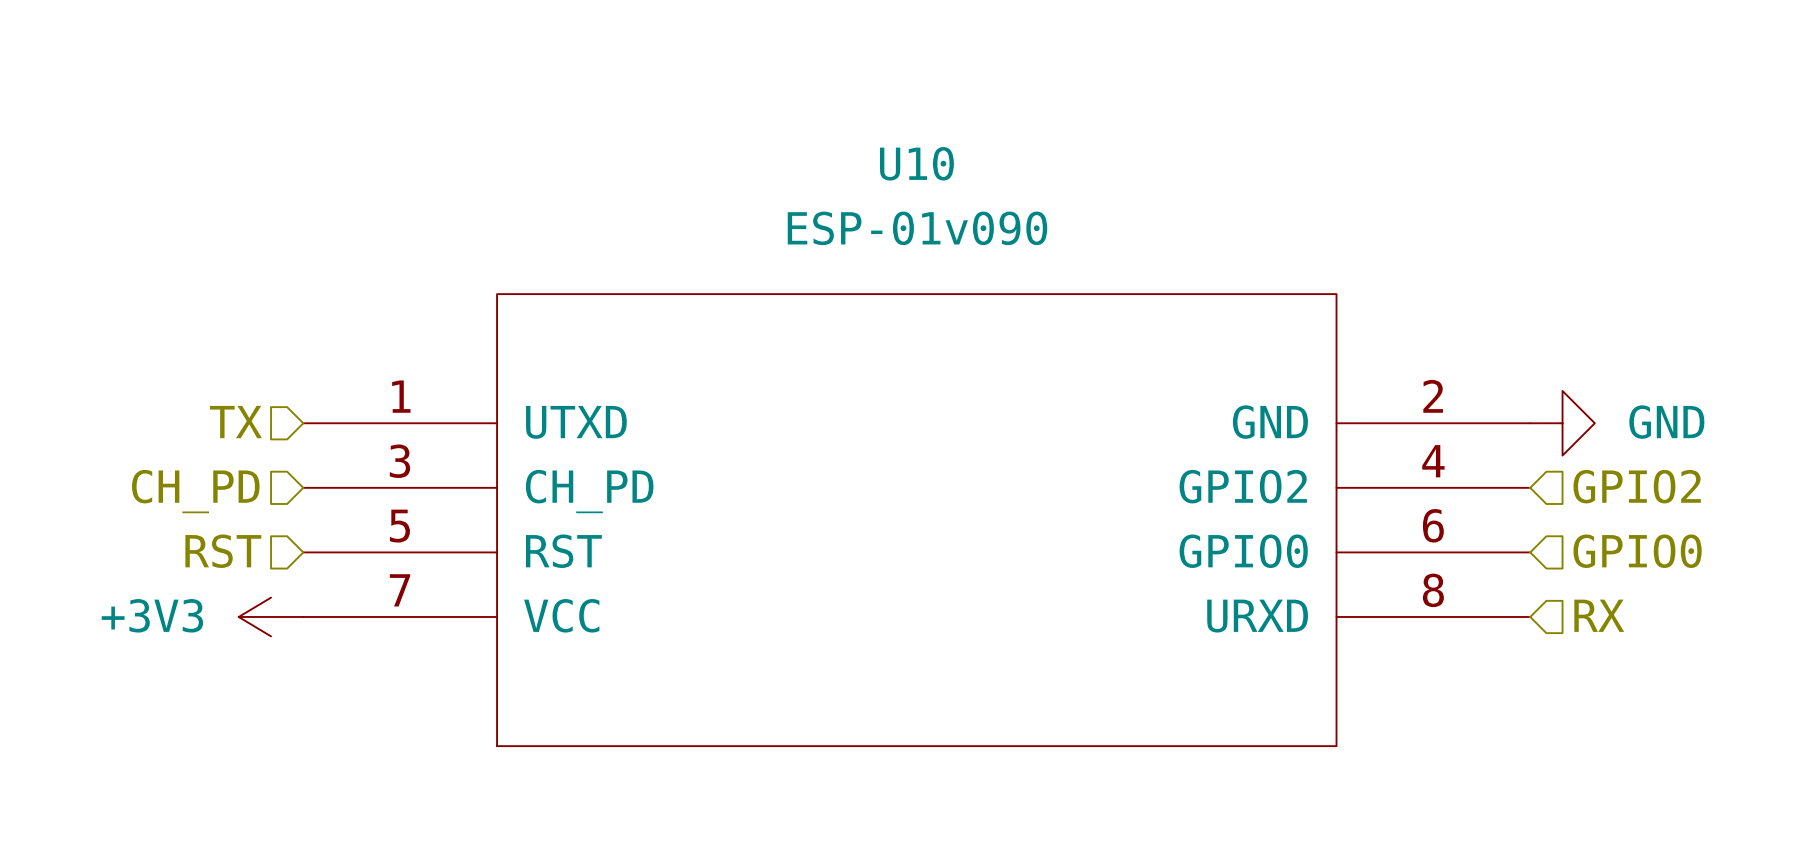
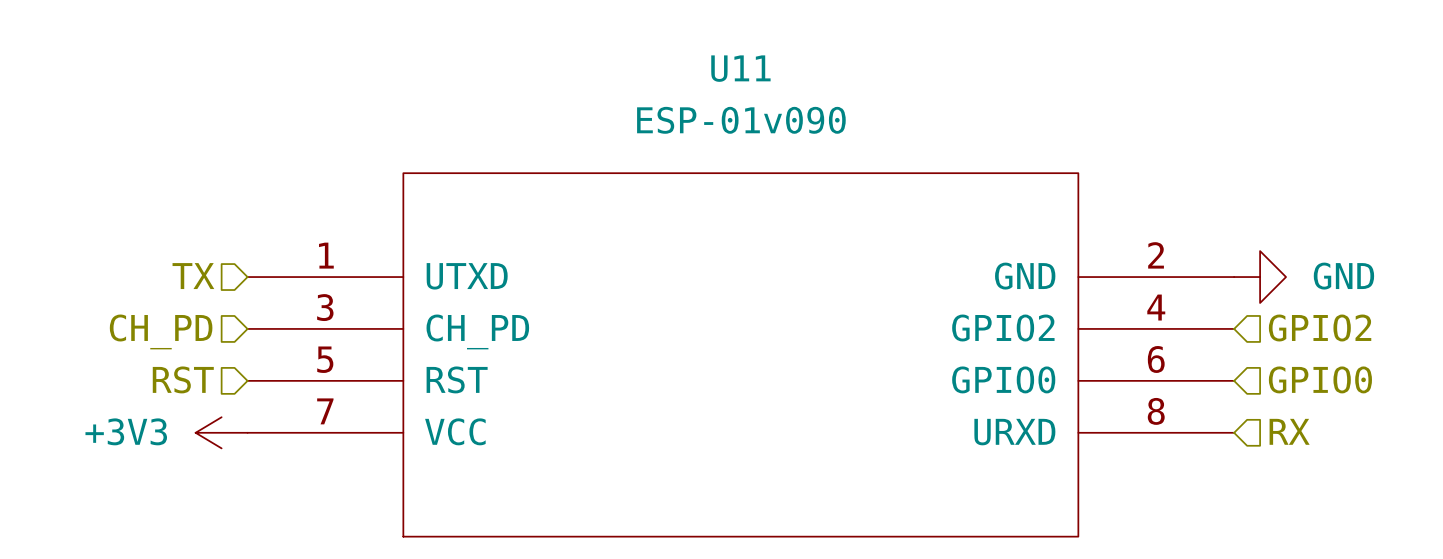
U10 name: U10 (916, 163) -> U11 (740, 68)

